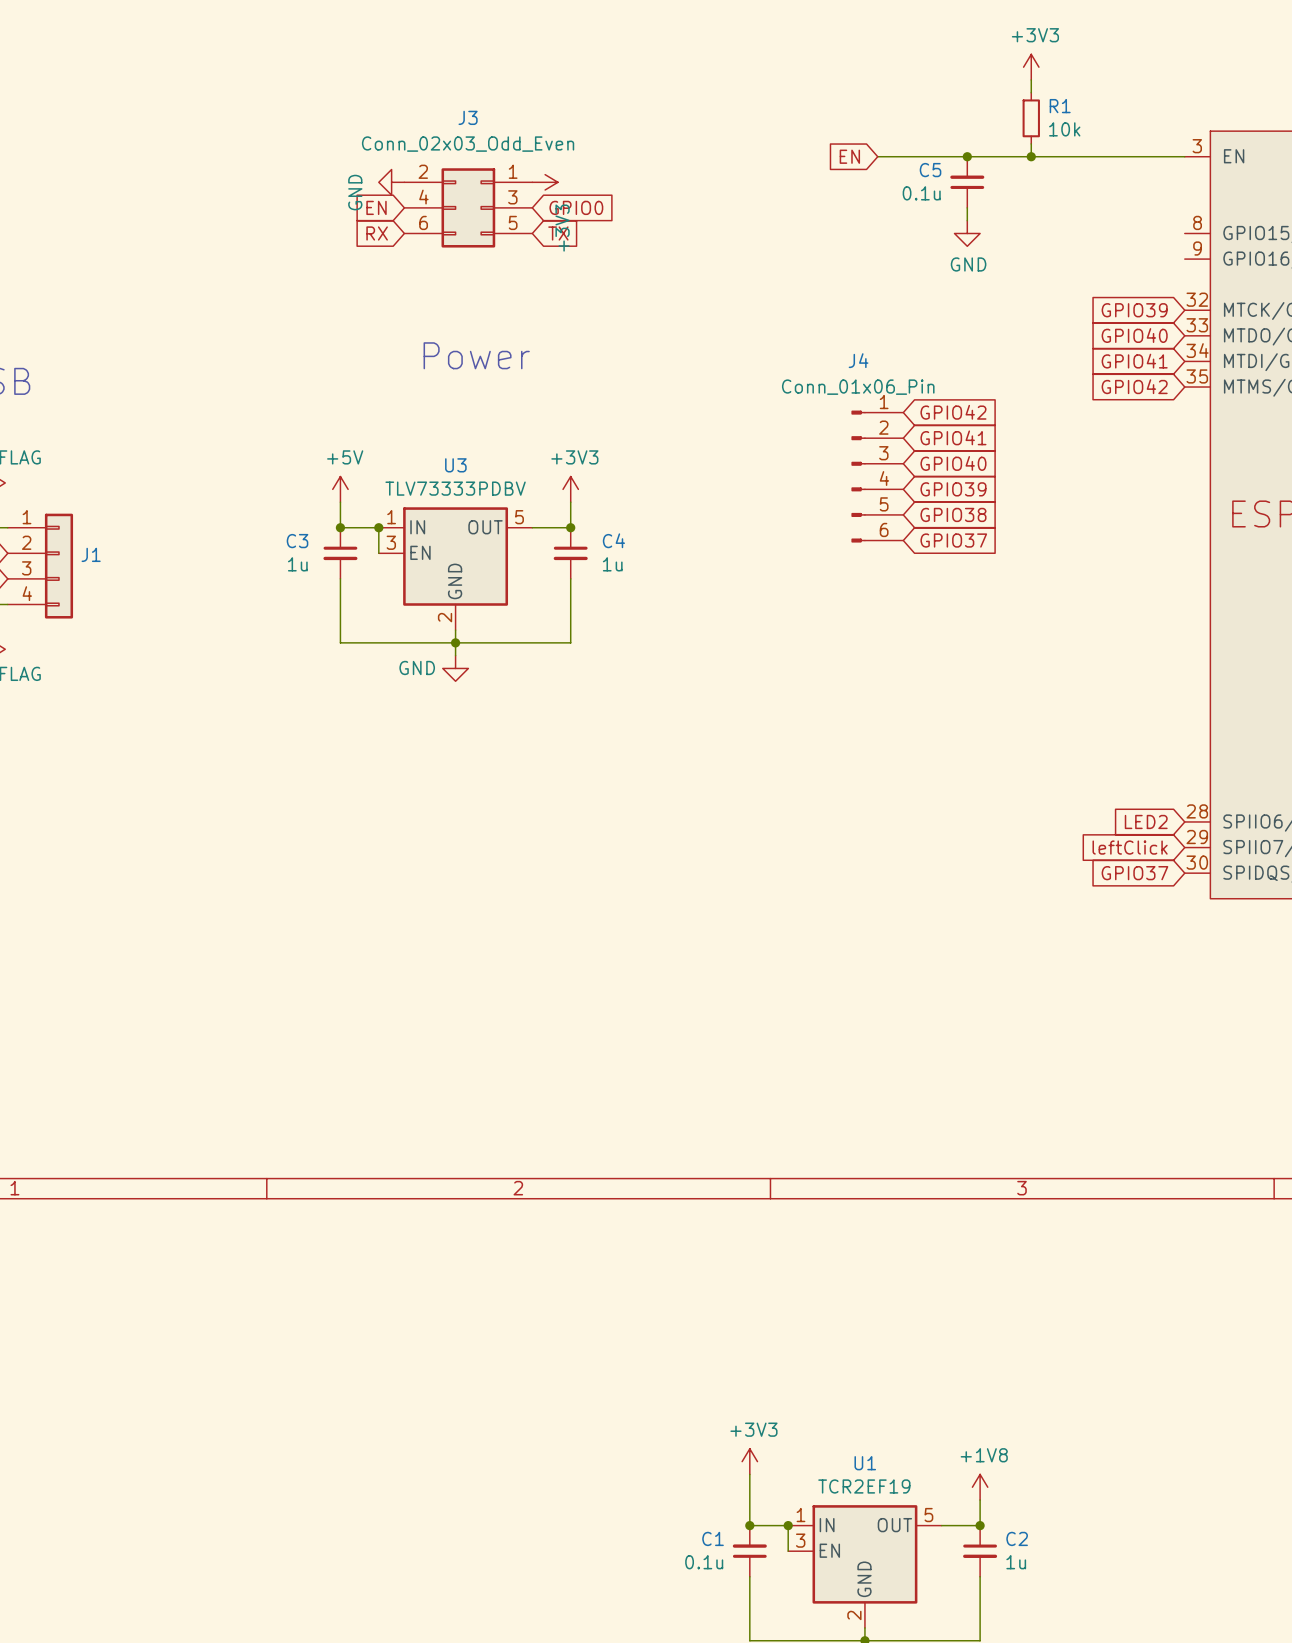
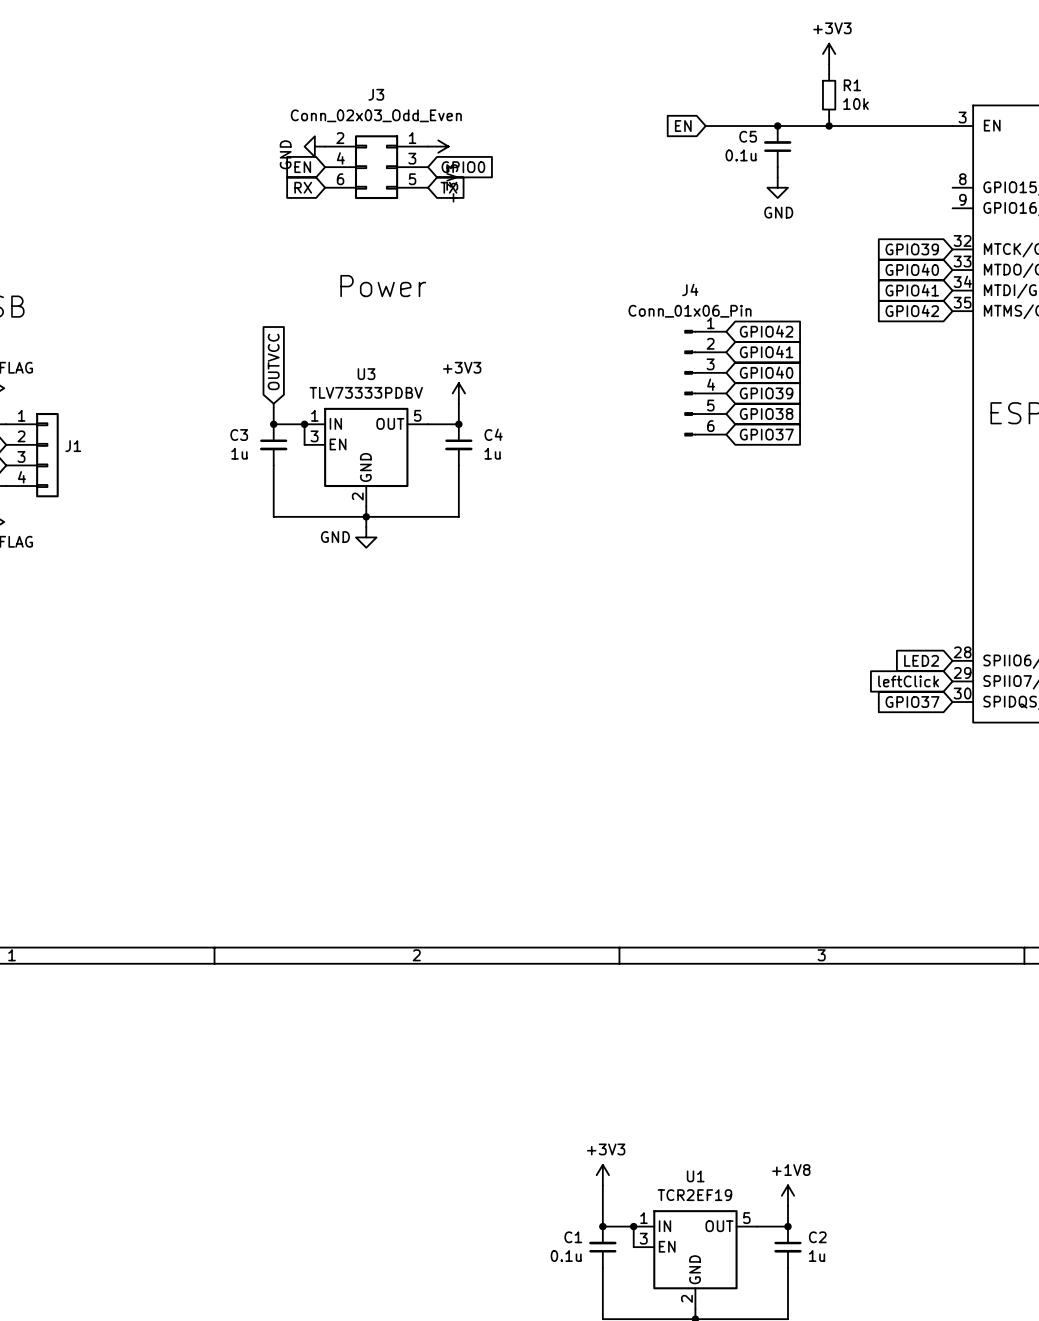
global label: none -> OUTVCC (273, 361)
power symbol: +5V (340, 489) -> none

